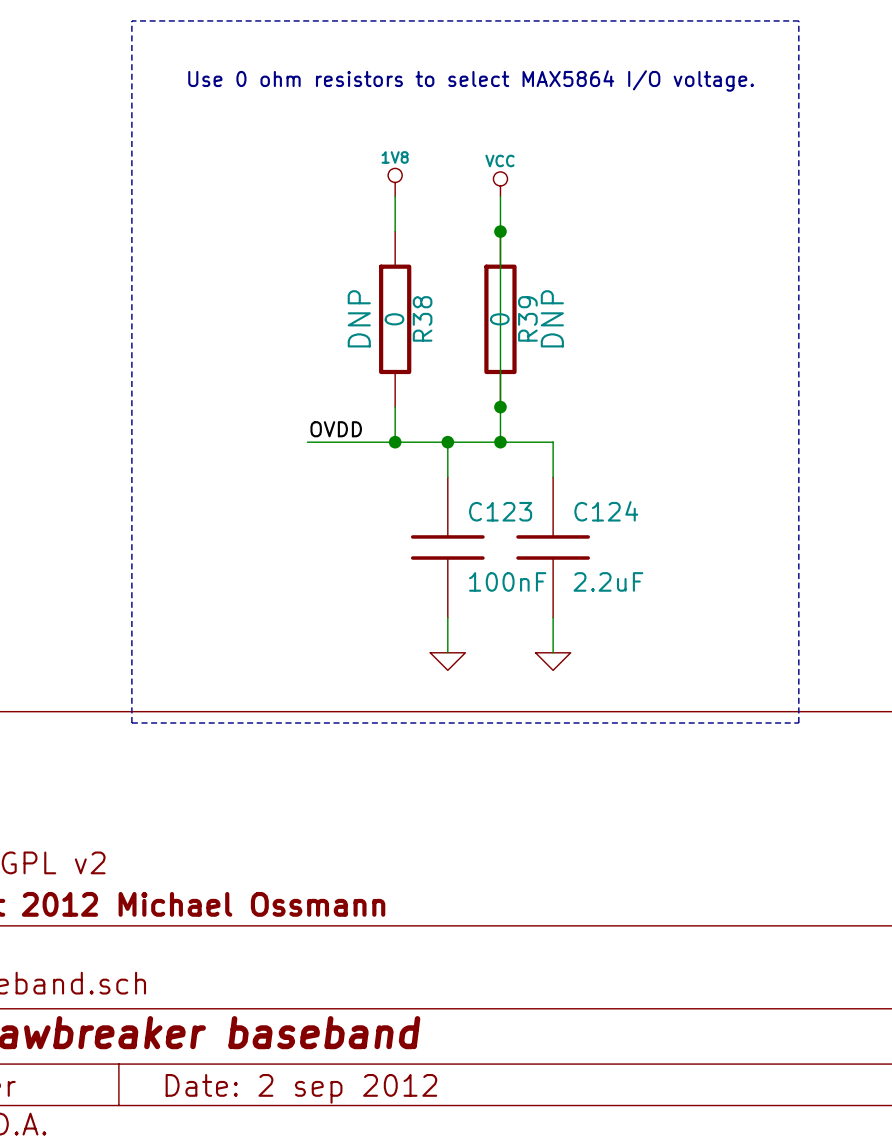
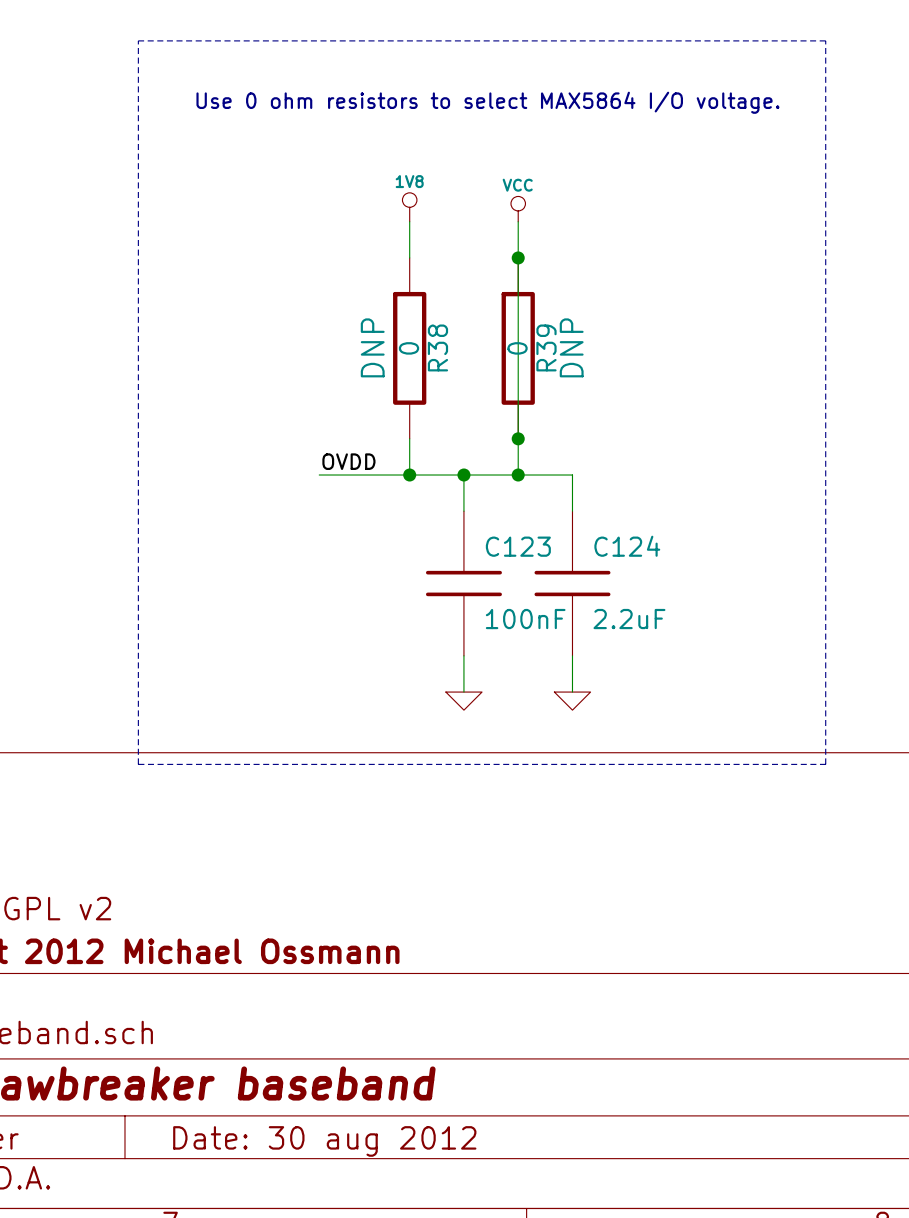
title block: Date: 2 sep 2012 (301, 1088) -> Date: 30 aug 2012 (324, 1141)

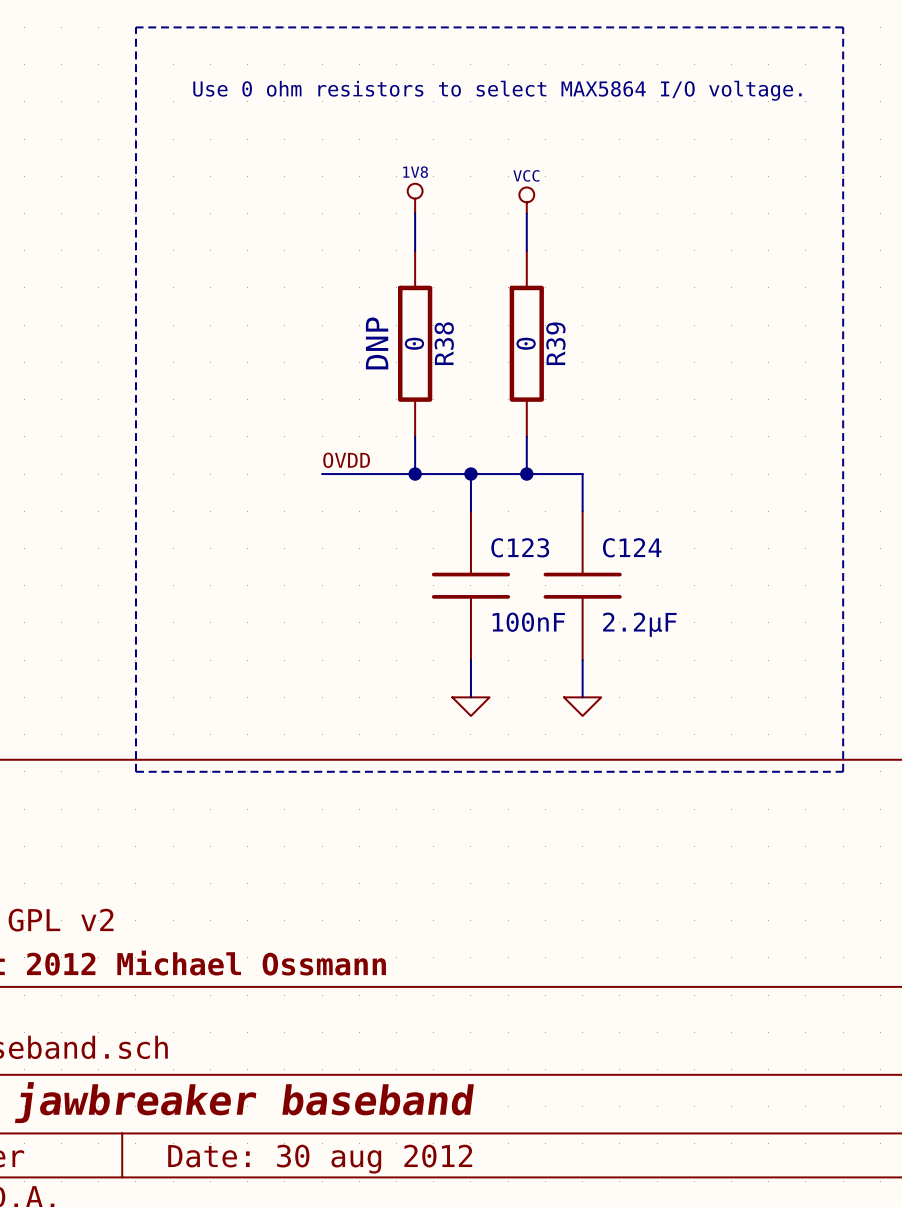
wire: (518, 257) (518, 438) -> none
junction: (518, 257) -> none
R39 text: DNP (571, 347) -> none
junction: (518, 438) -> none
C124 value: 2.2uF (629, 619) -> 2.2μF (639, 624)

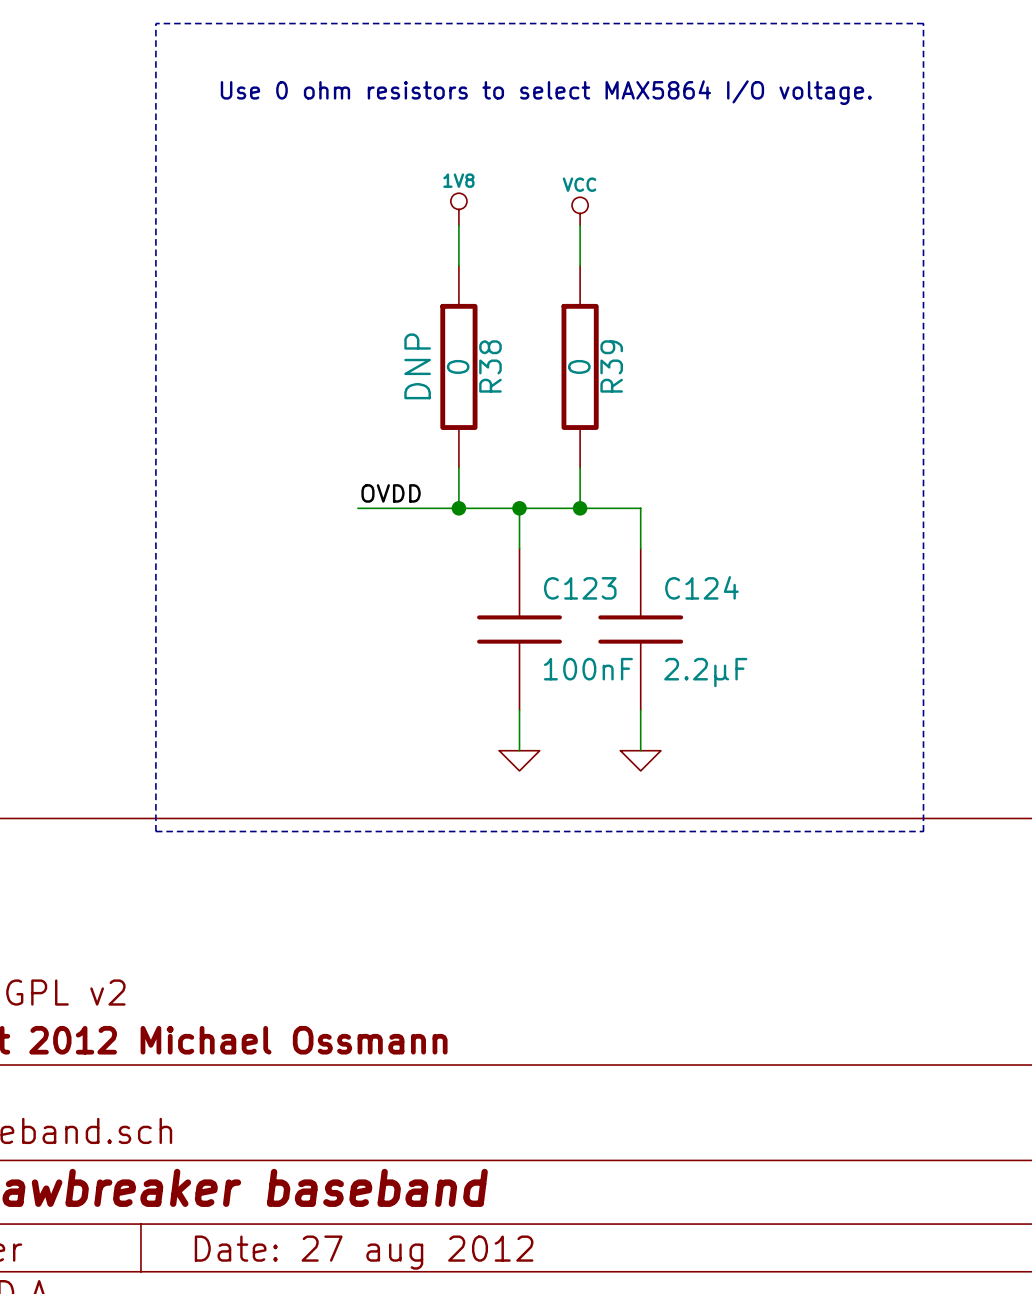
title block: Date: 30 aug 2012 (320, 1159) -> Date: 27 aug 2012 (364, 1252)

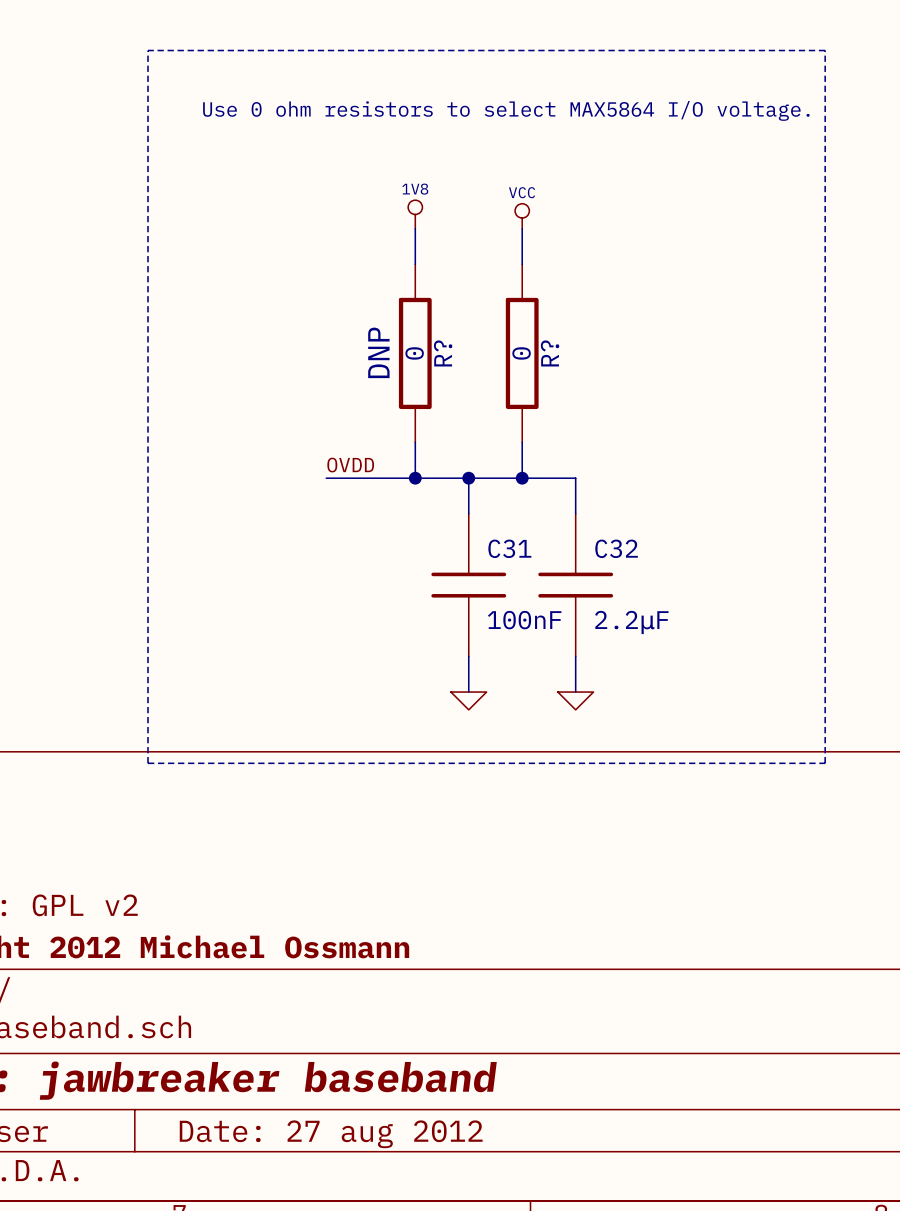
R38 name: R38 (490, 366) -> R? (443, 353)
R39 name: R39 (611, 366) -> R? (550, 353)
C124 name: C124 (701, 587) -> C32 (616, 548)
C123 name: C123 (580, 588) -> C31 (509, 548)

